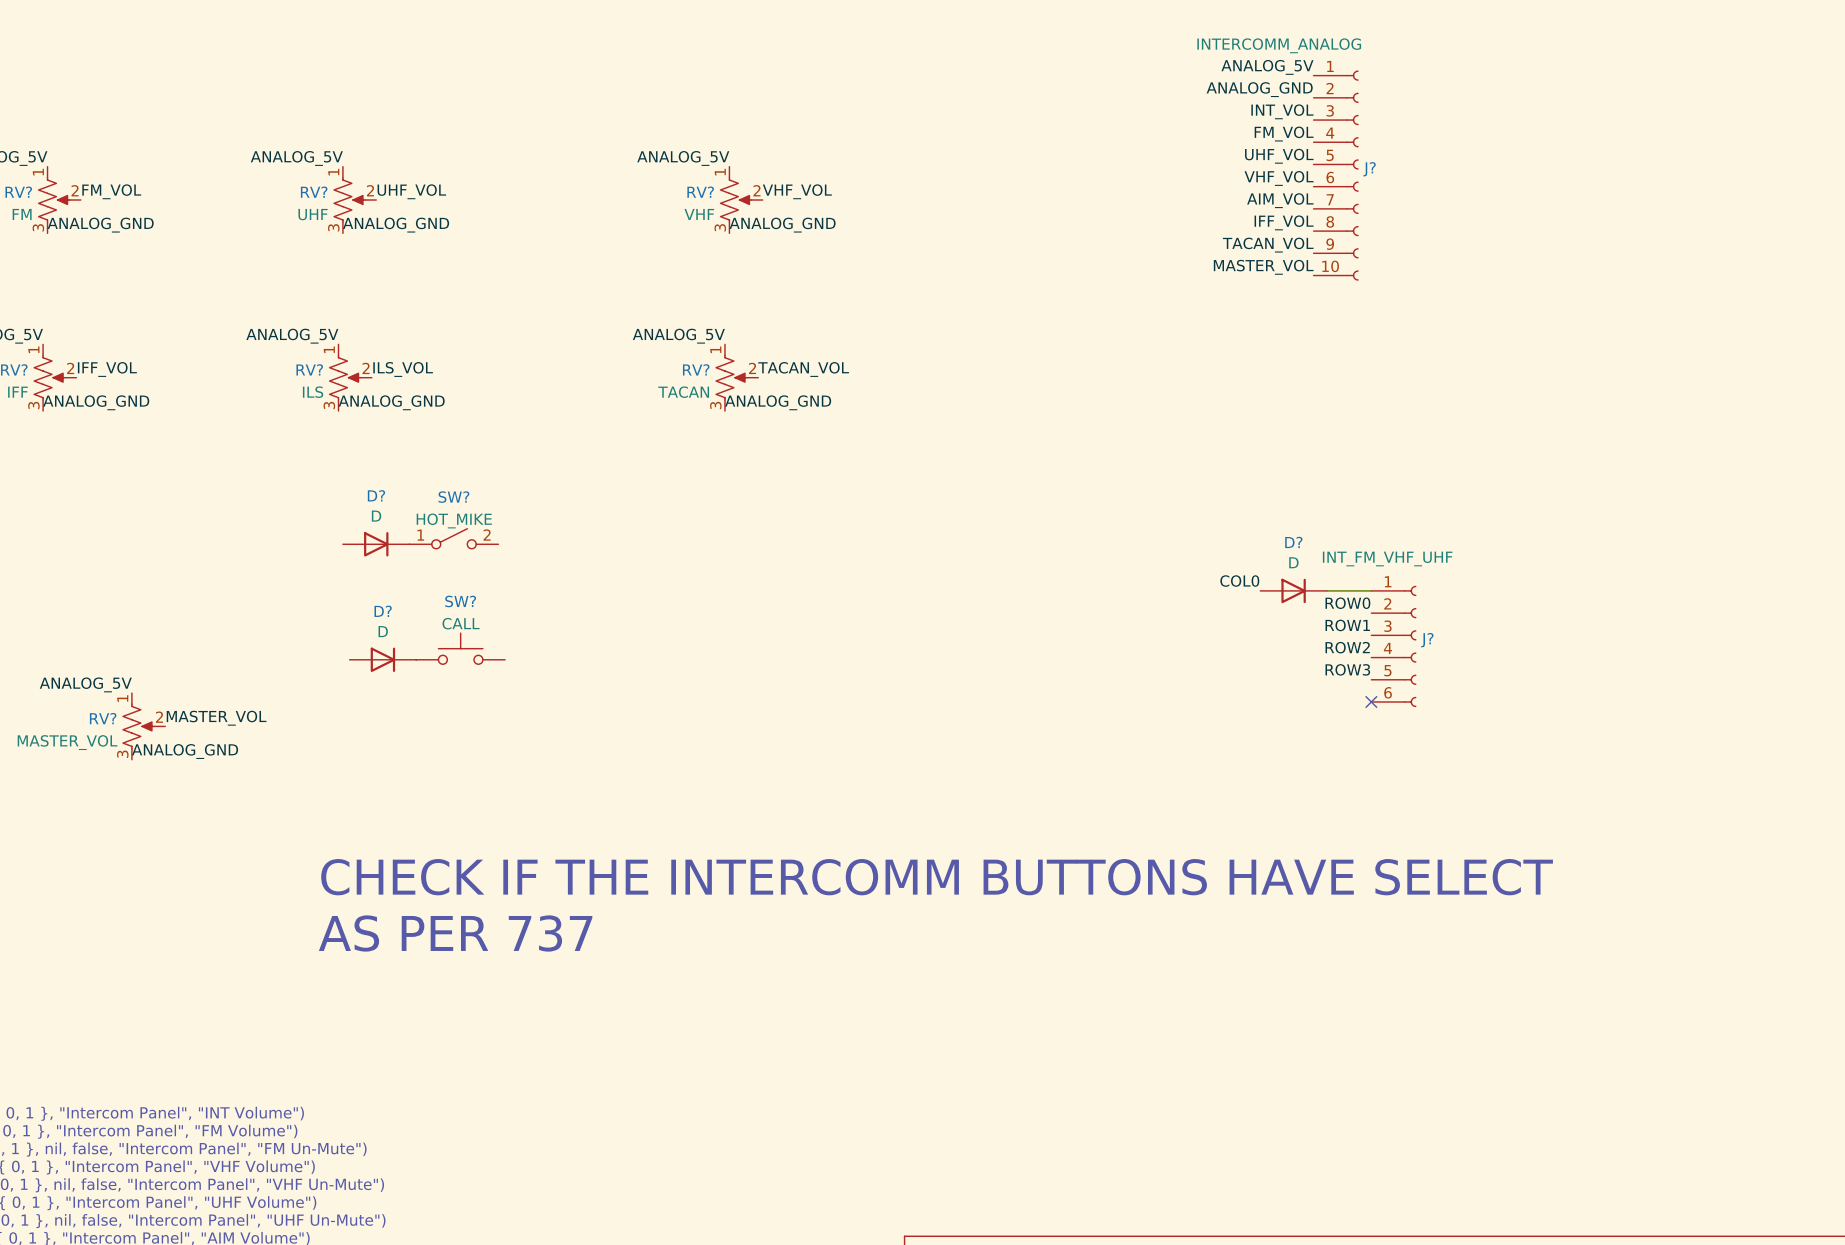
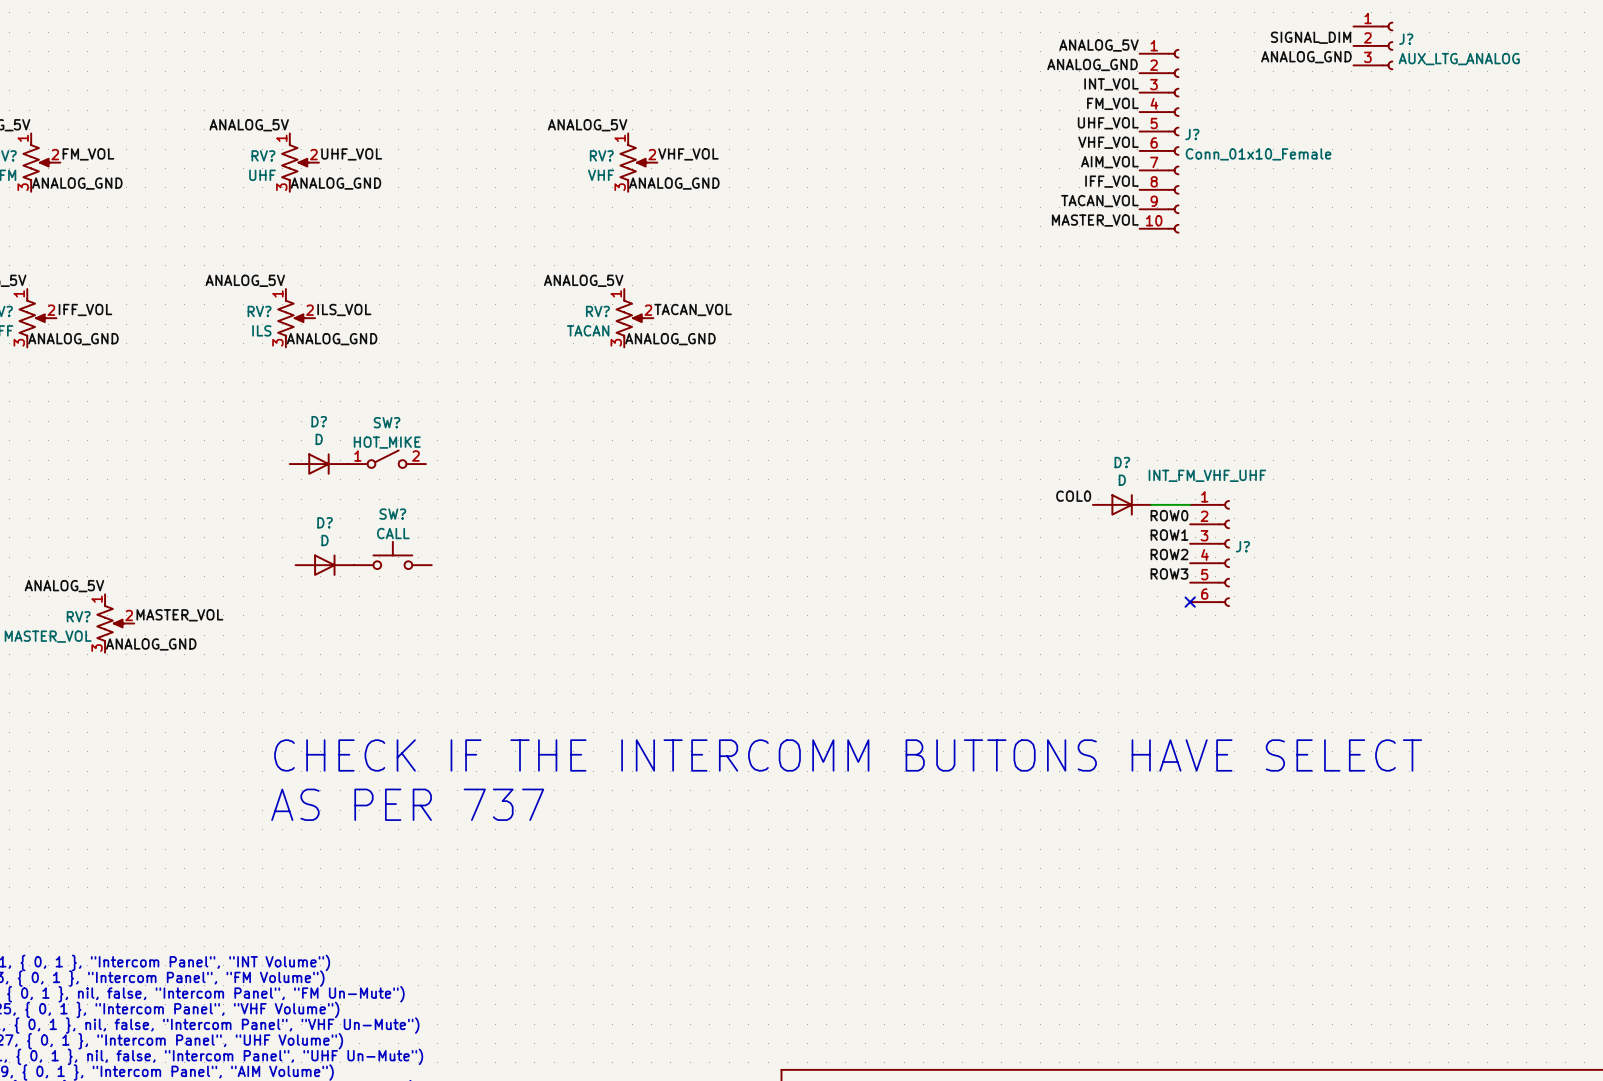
J? value: INTERCOMM_ANALOG (1279, 45) -> Conn_01x10_Female (1258, 154)
label: none -> SIGNAL_DIM (1311, 37)
J?: none -> AUX_LTG_ANALOG (1373, 45)
label: none -> ANALOG_GND (1306, 57)

